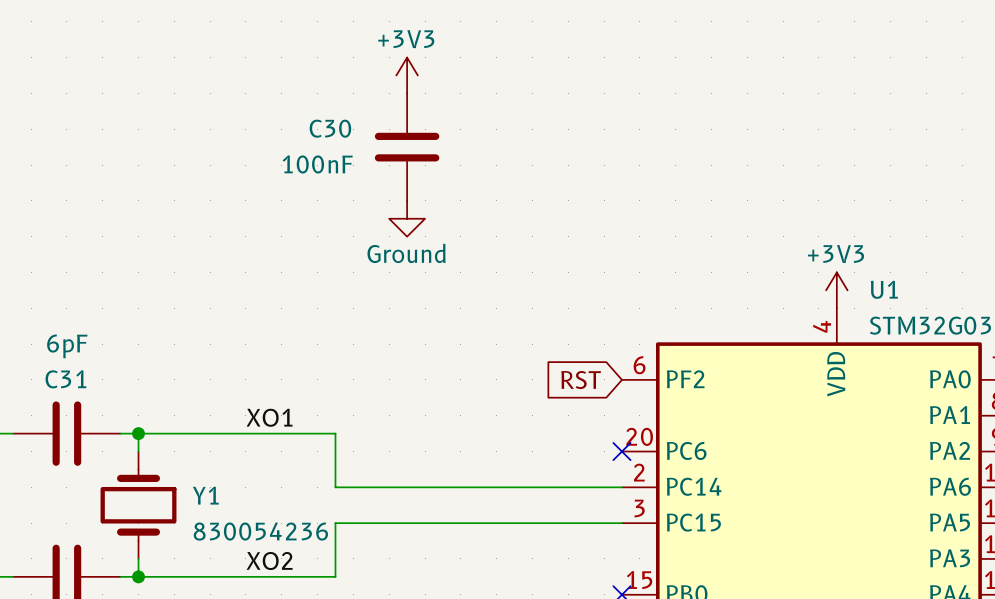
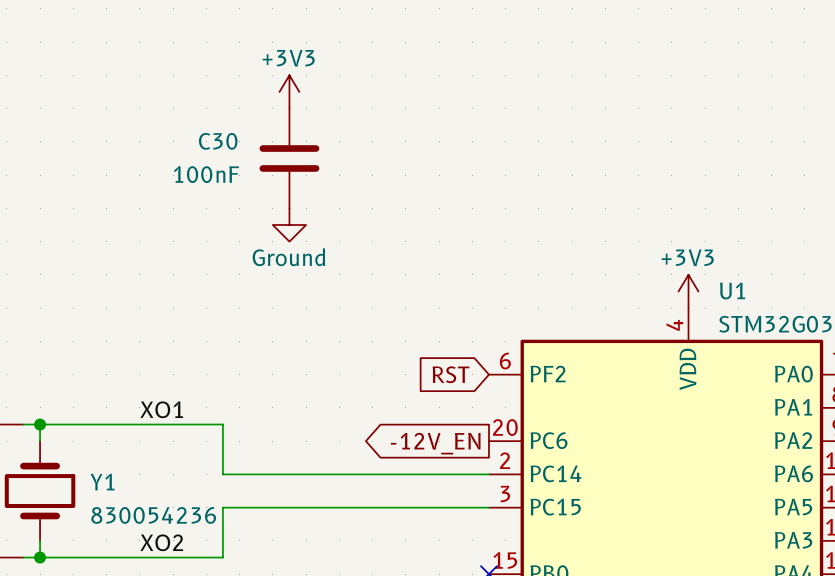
no-connect mark: (621, 451) -> none
global label: none -> -12V_EN (435, 443)

